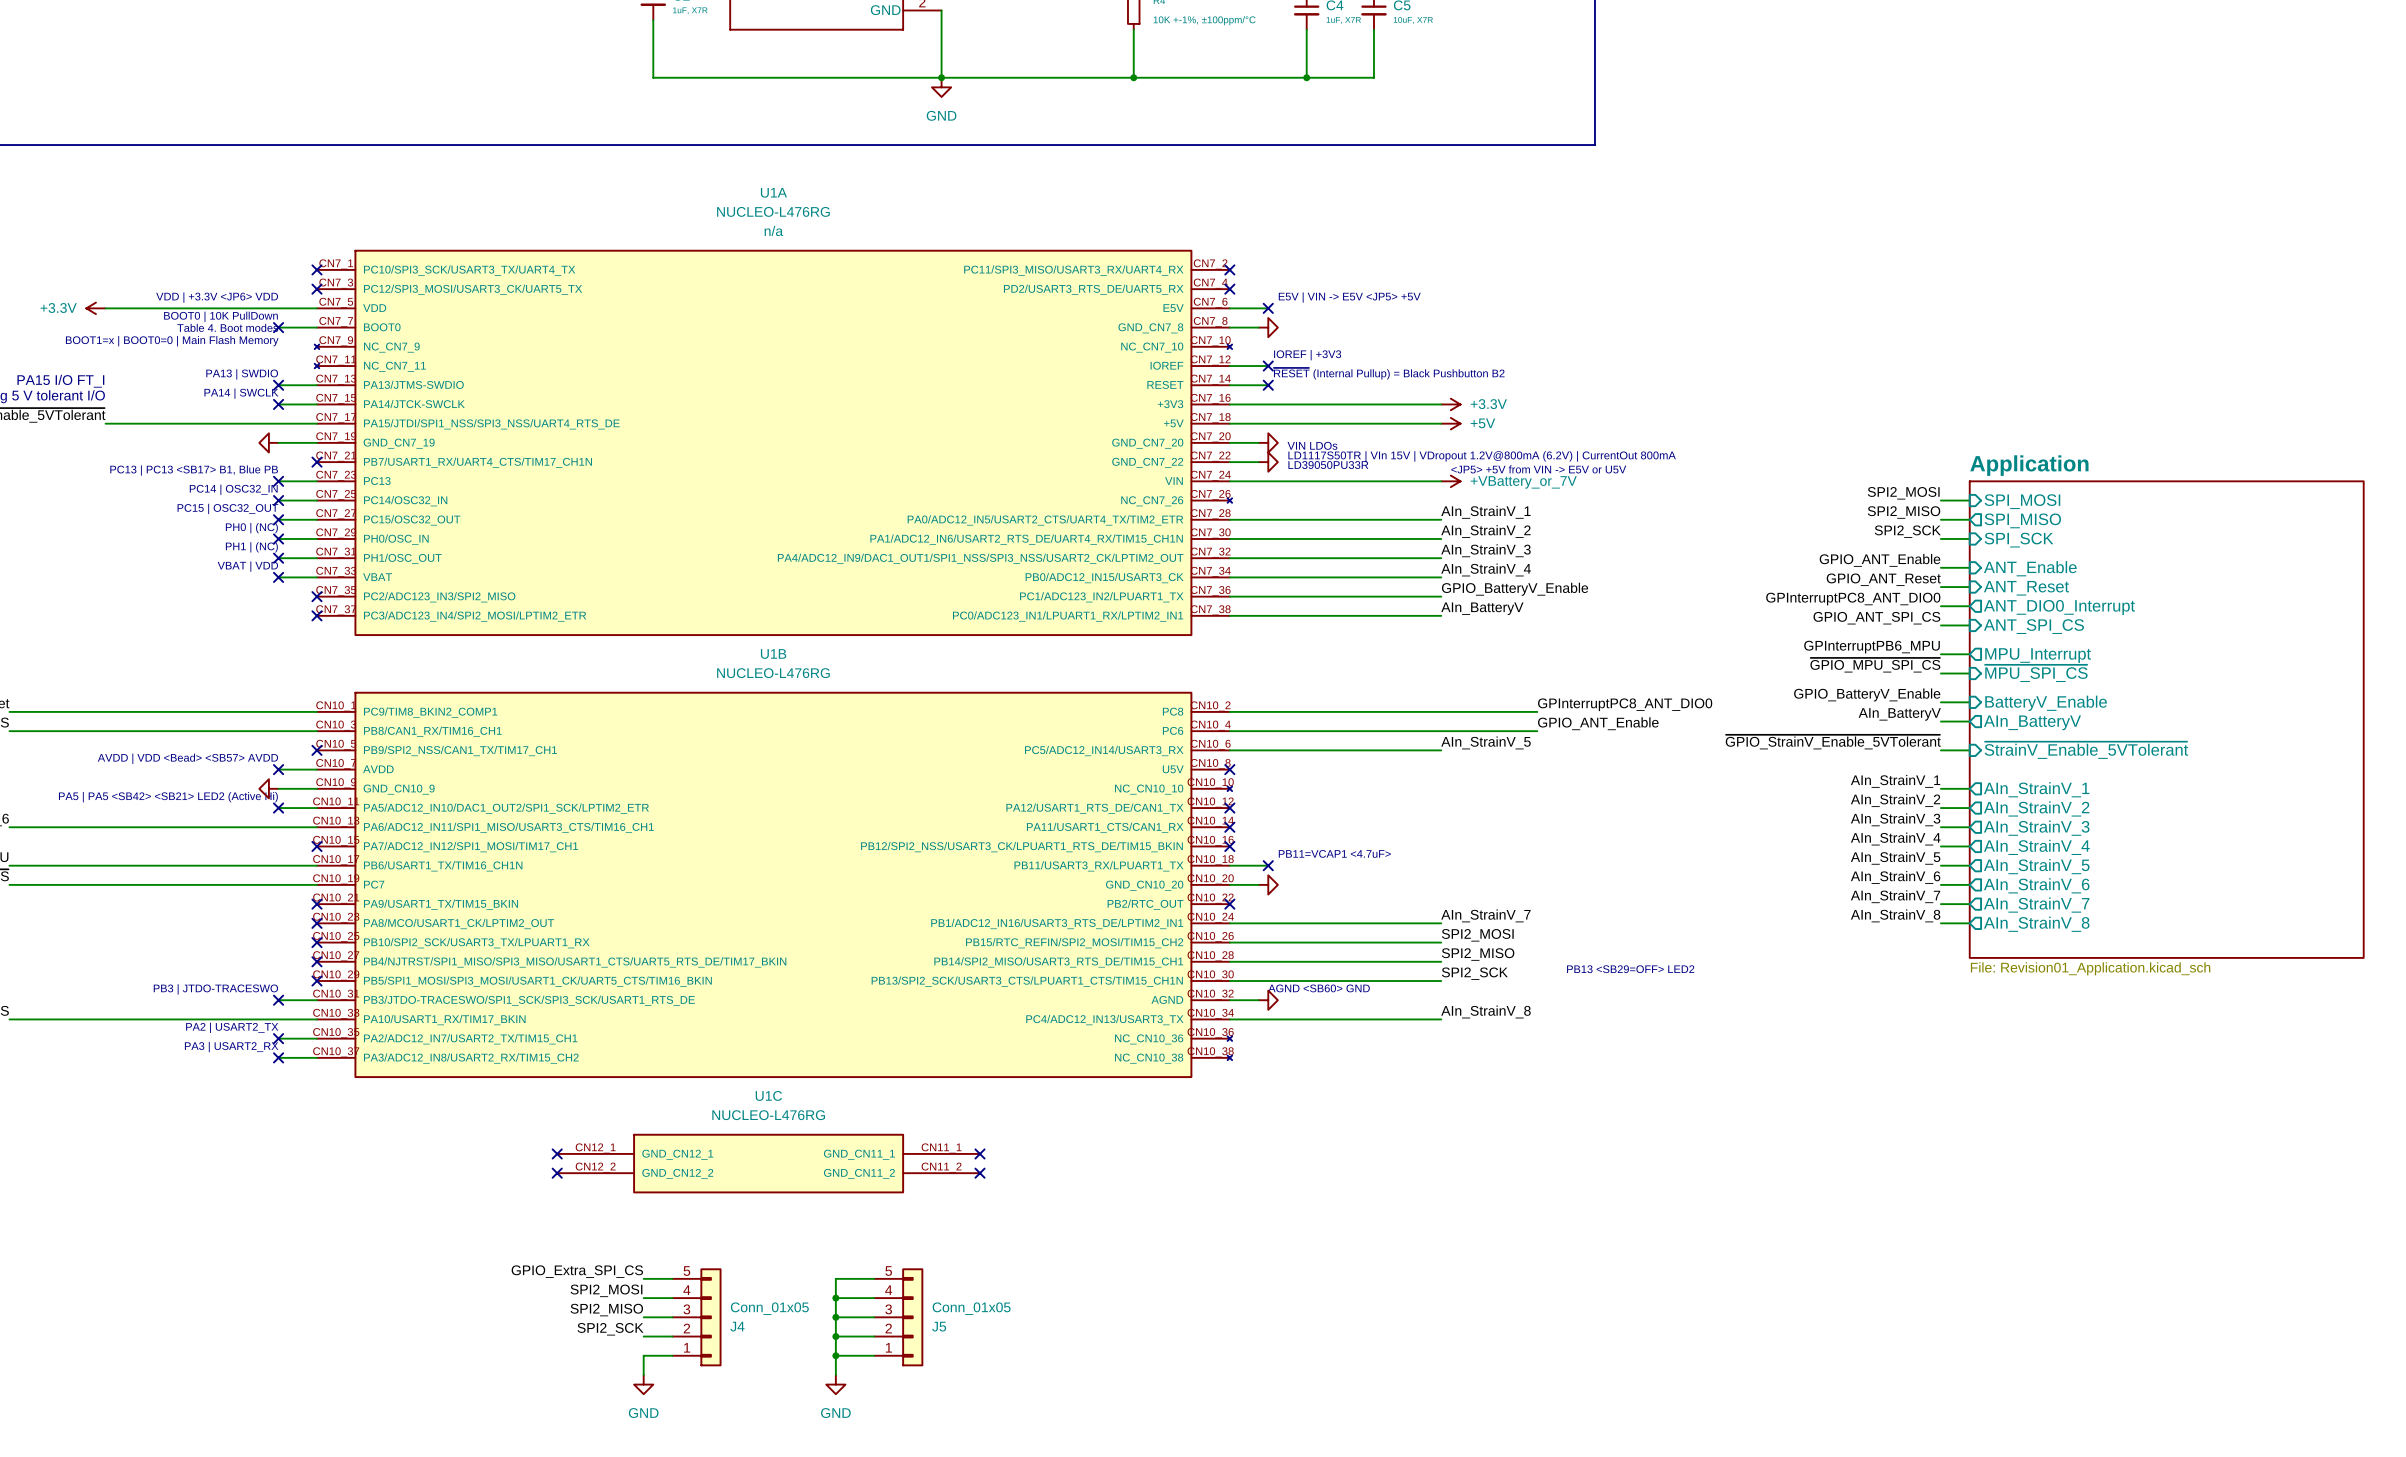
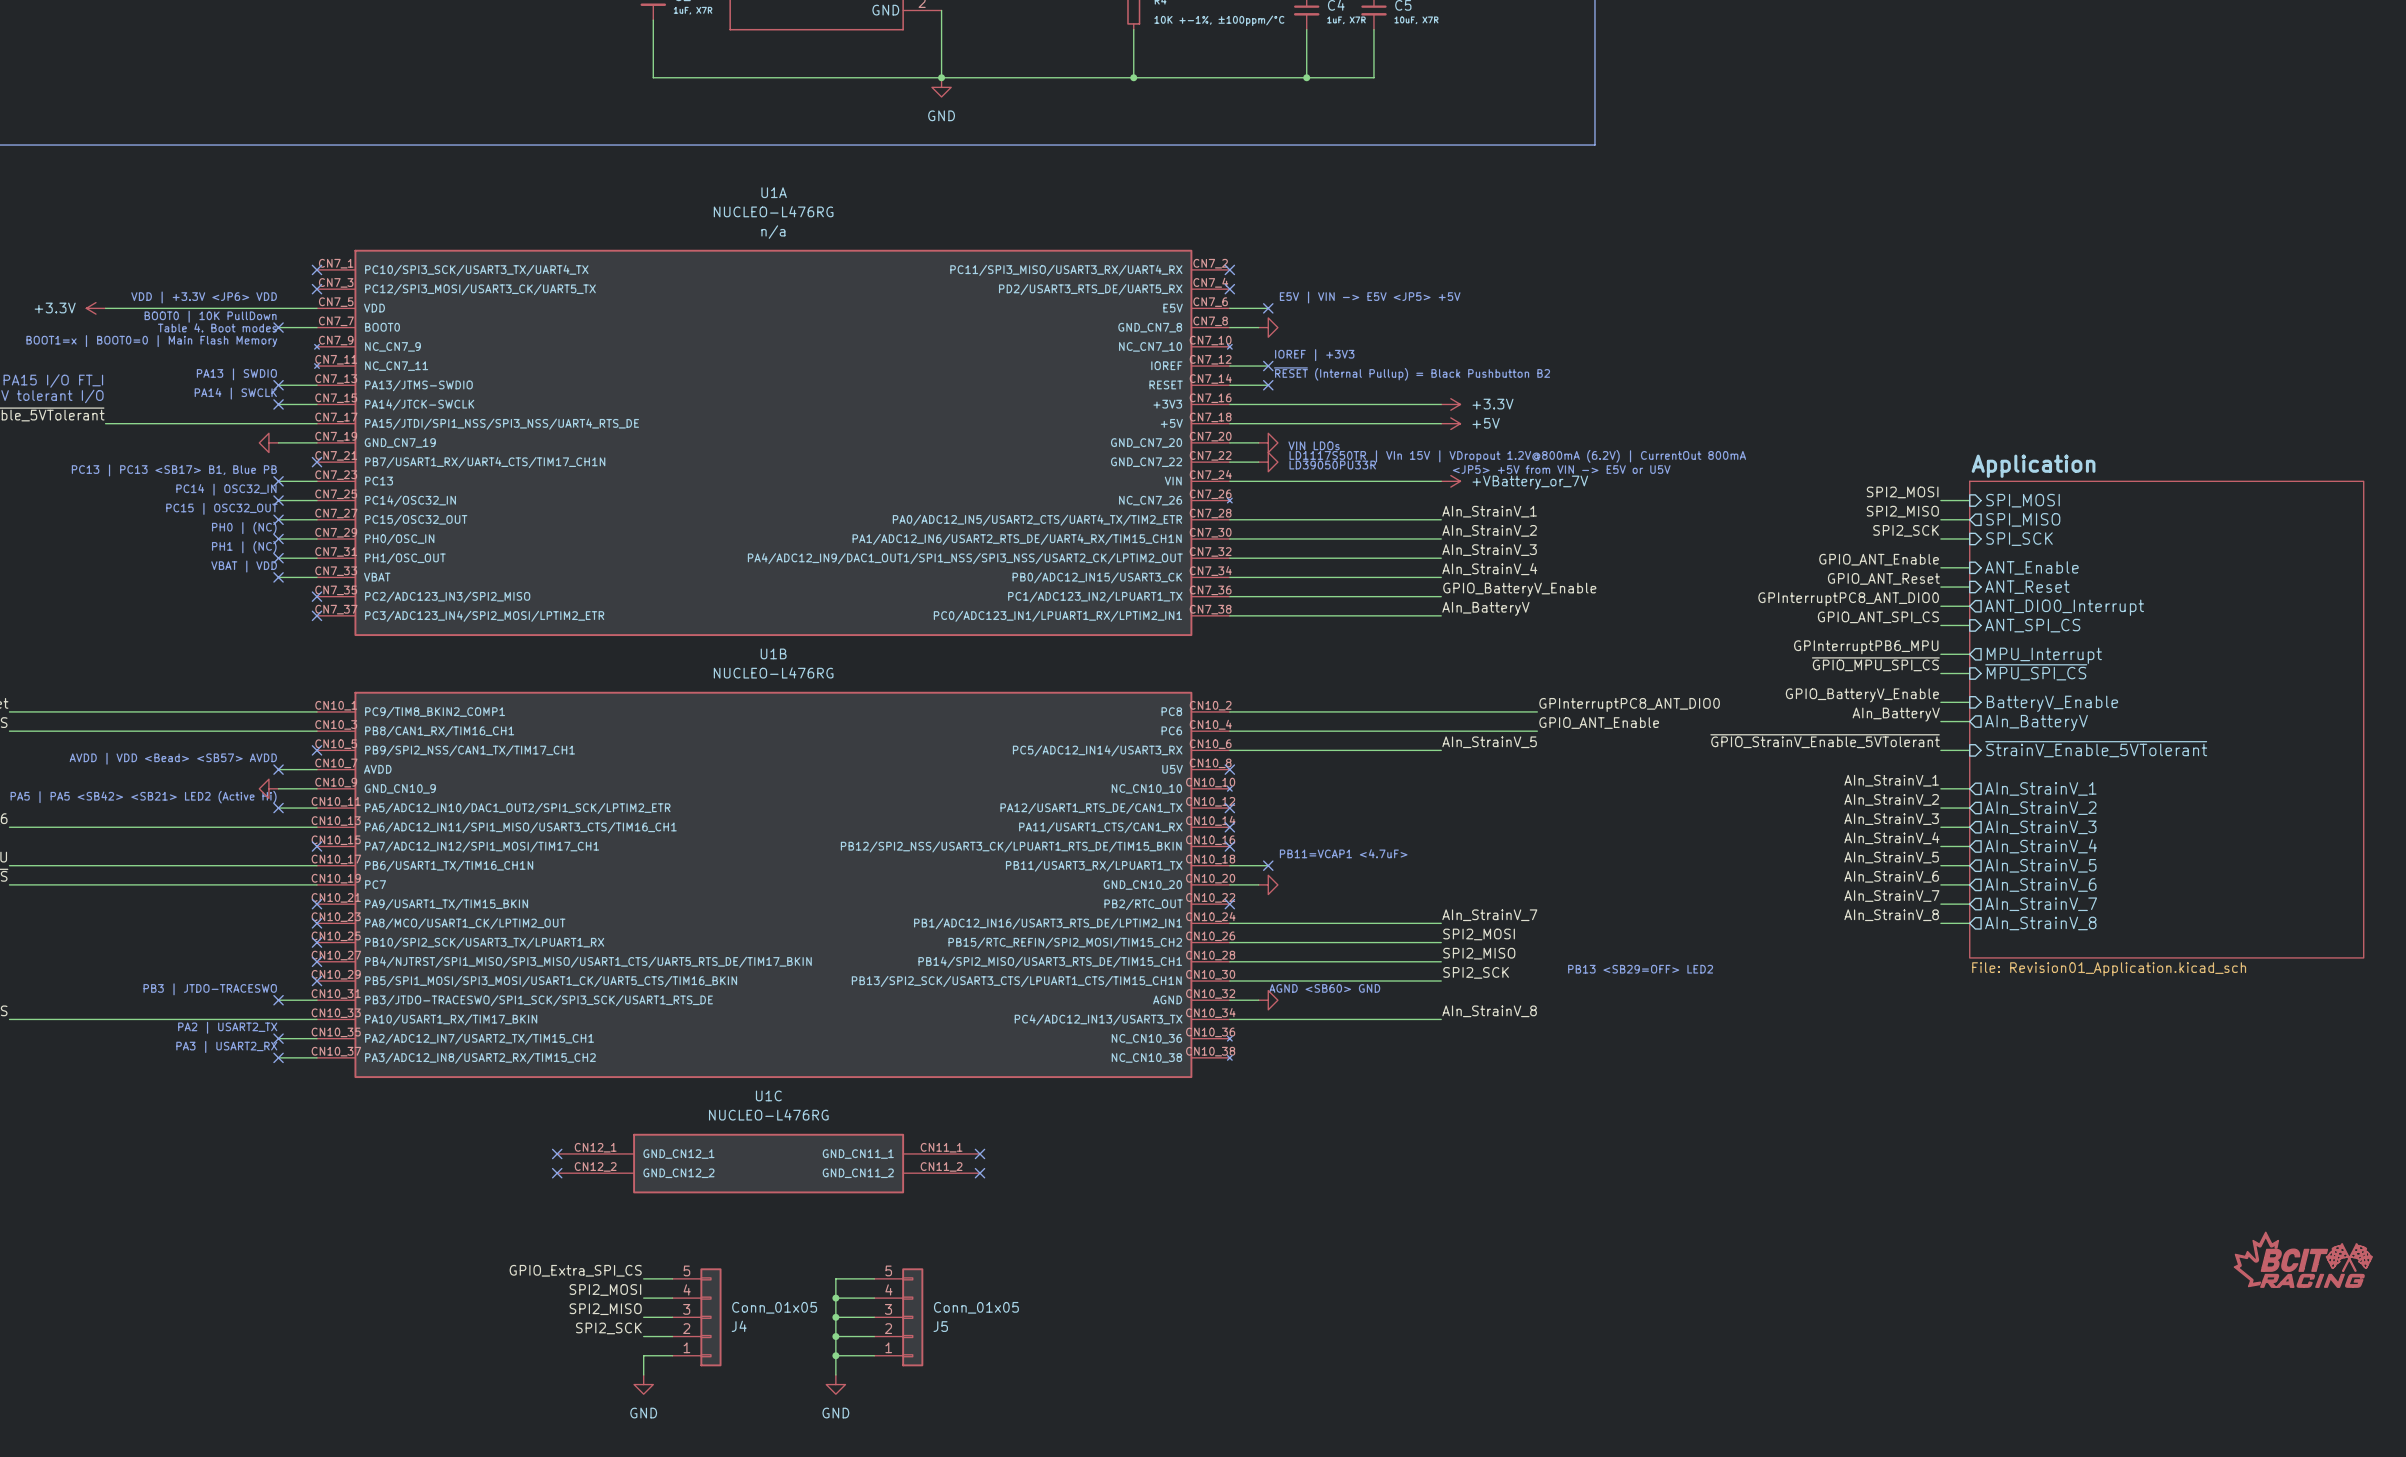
power symbol: none -> (2303, 1259)

